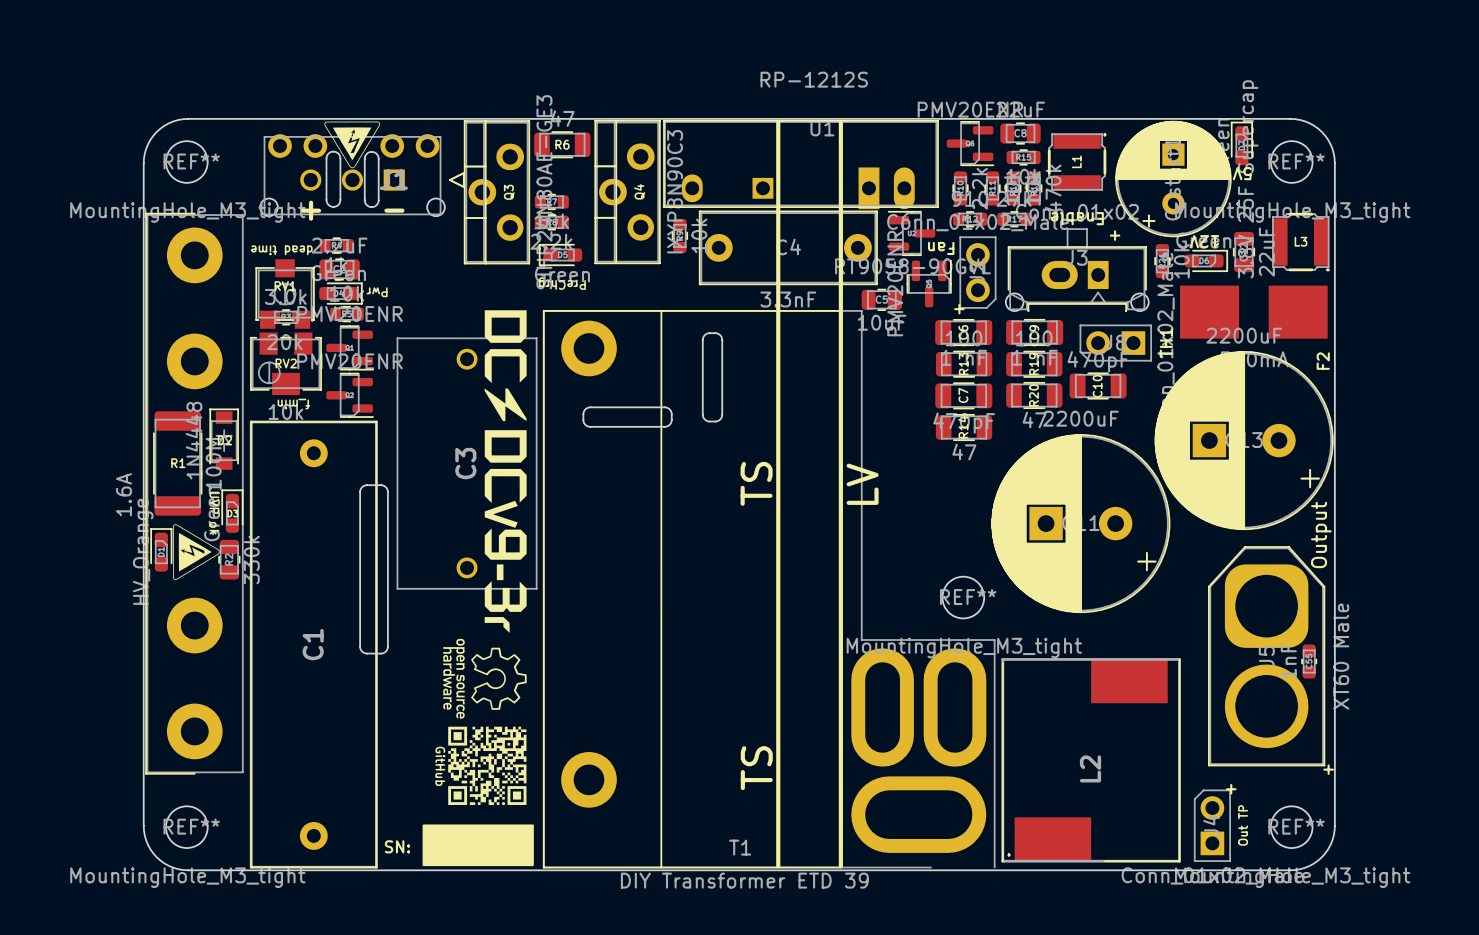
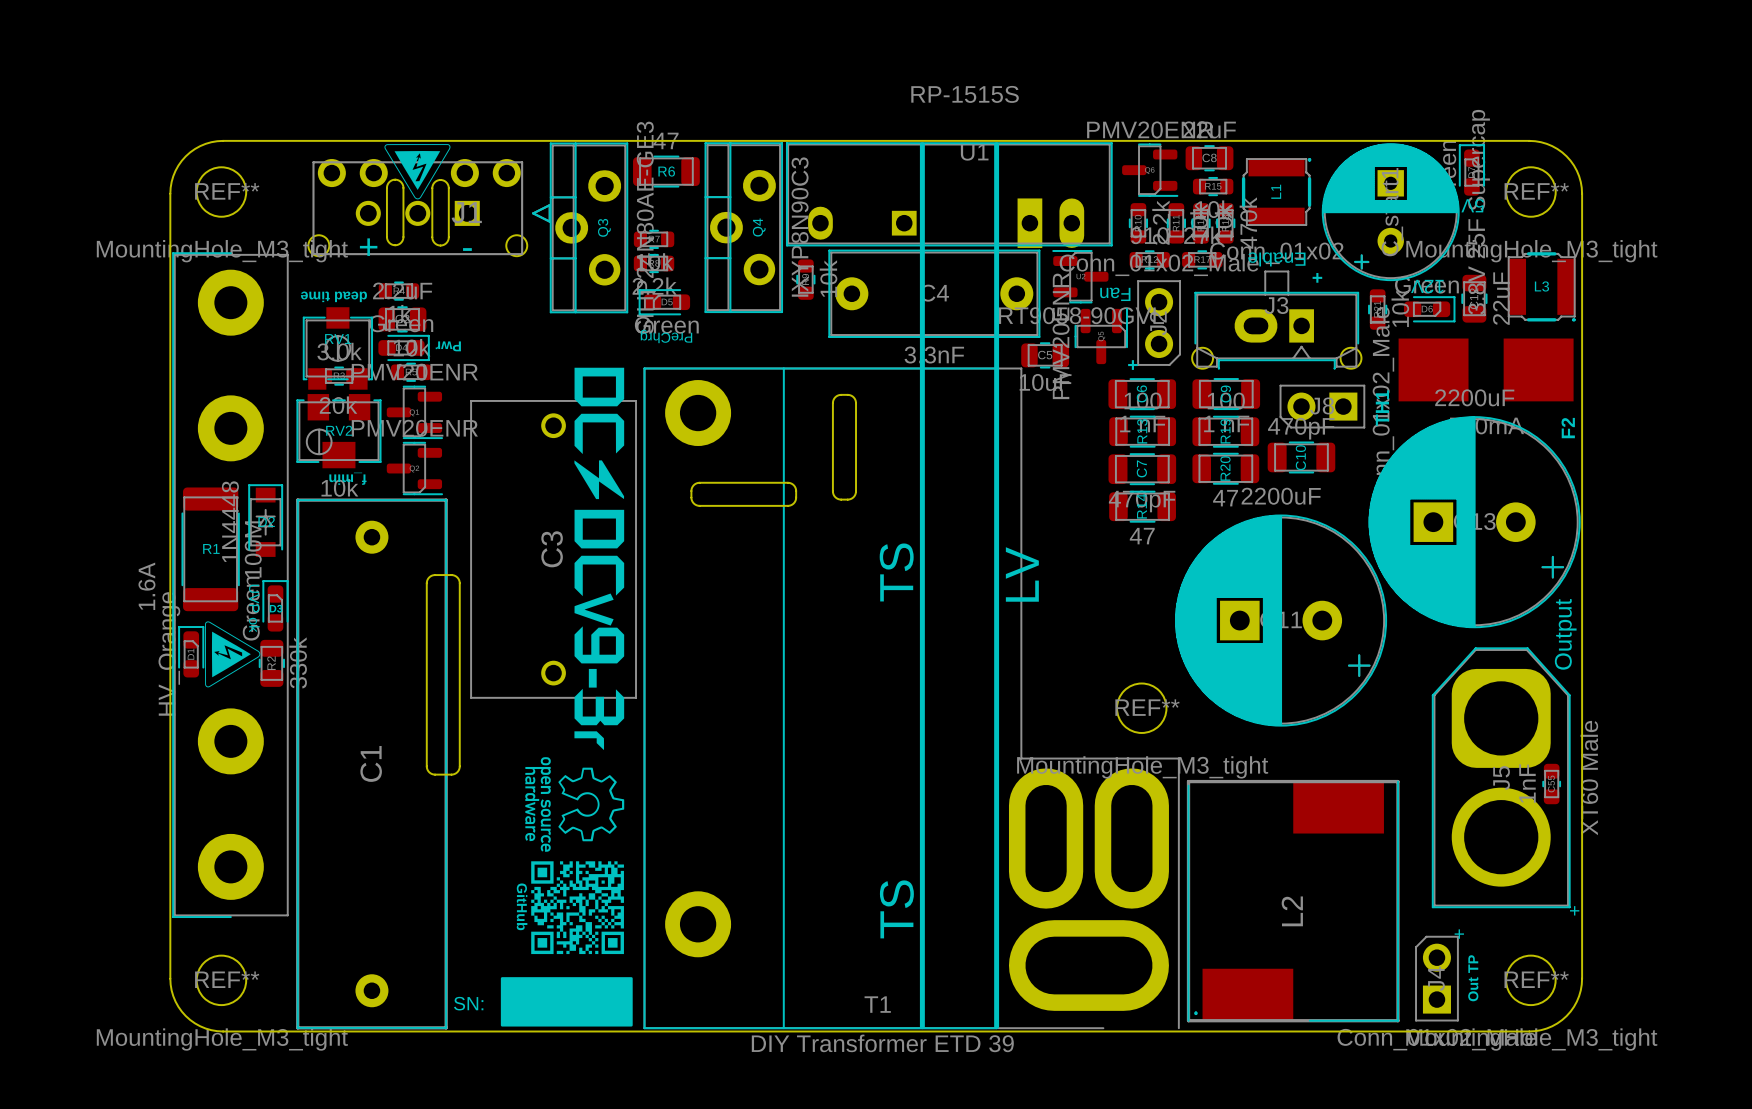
U1 value: RP-1212S (814, 79) -> RP-1515S (965, 94)

